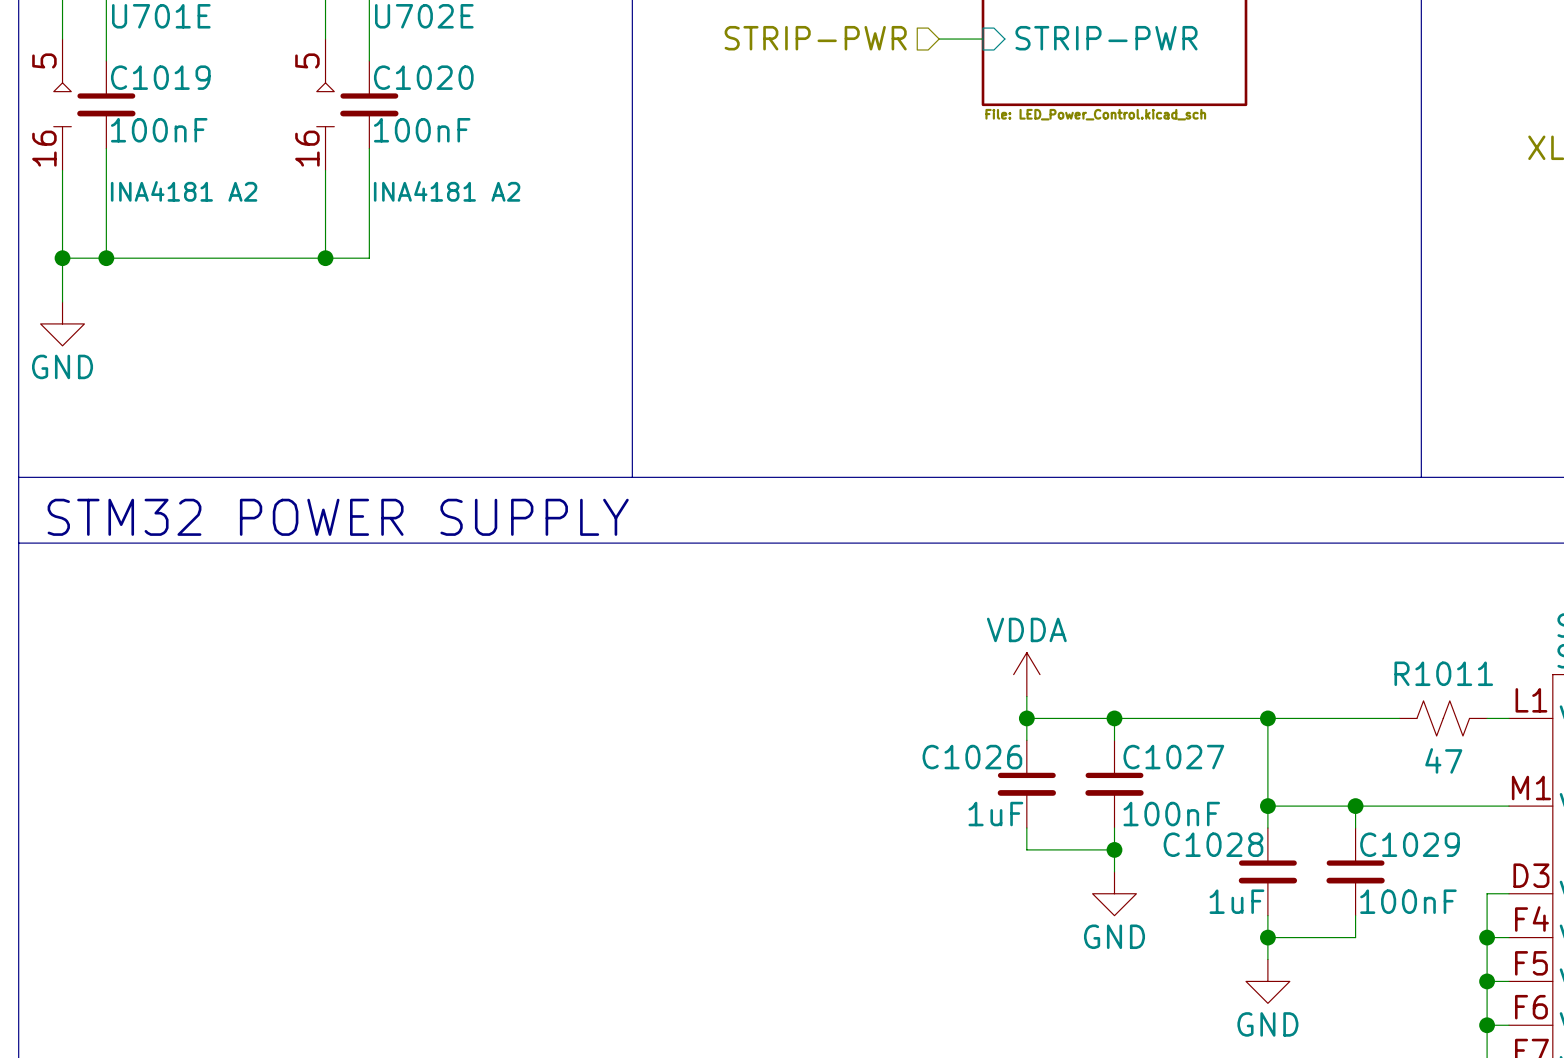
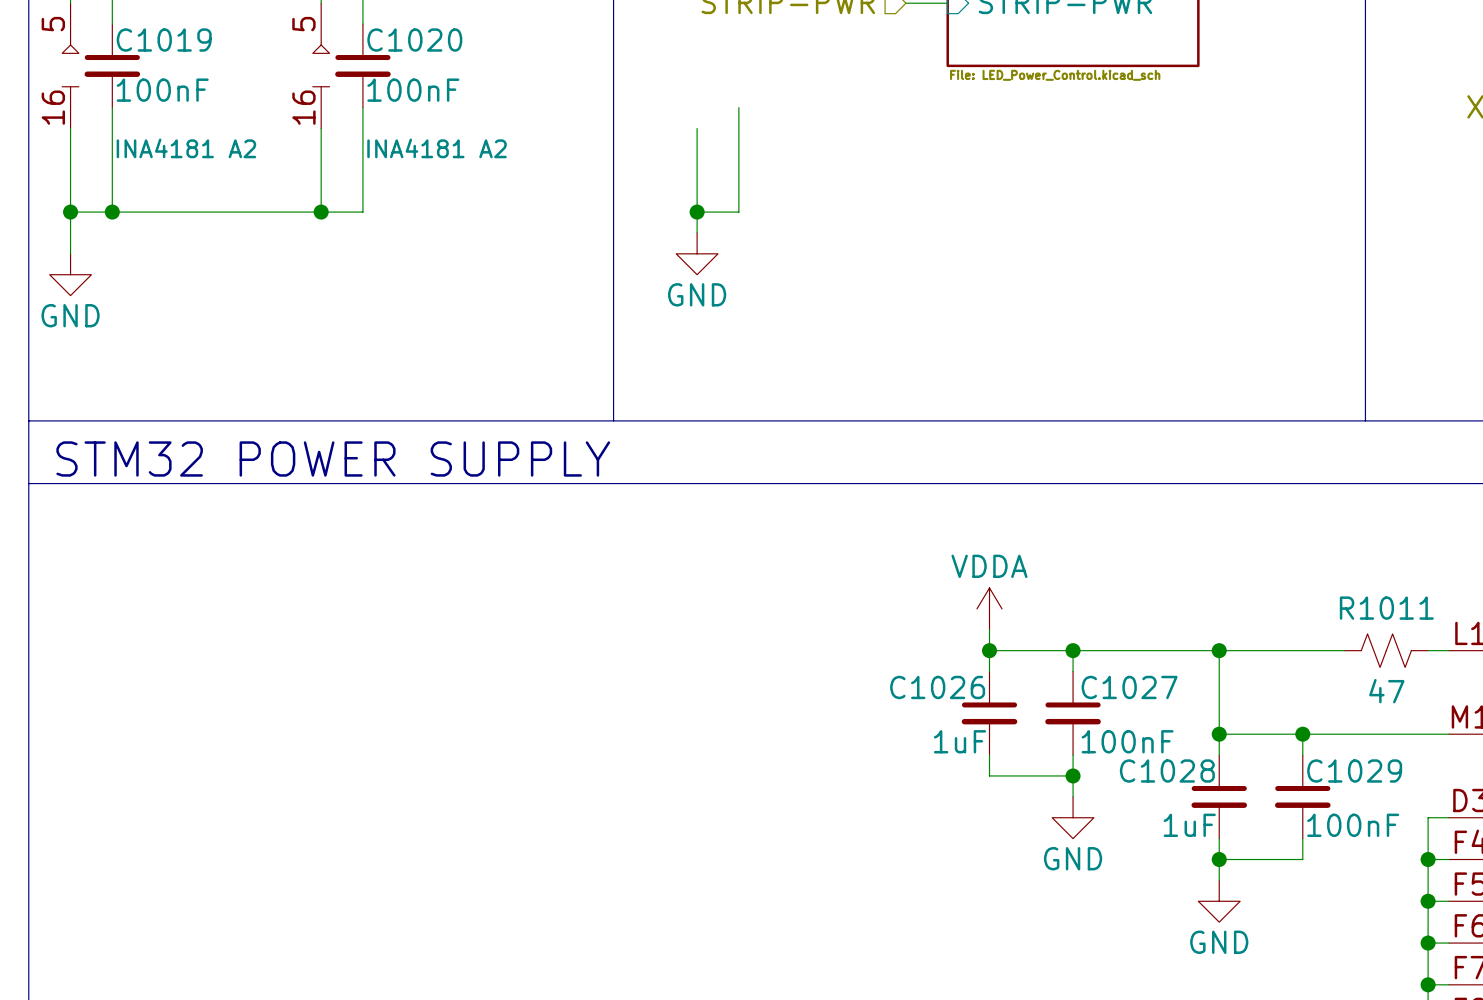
wire: none -> (738, 107) (738, 212) (697, 212)
wire: none -> (697, 128) (697, 232)
junction: none -> (697, 212)
power symbol: none -> GND (697, 253)

